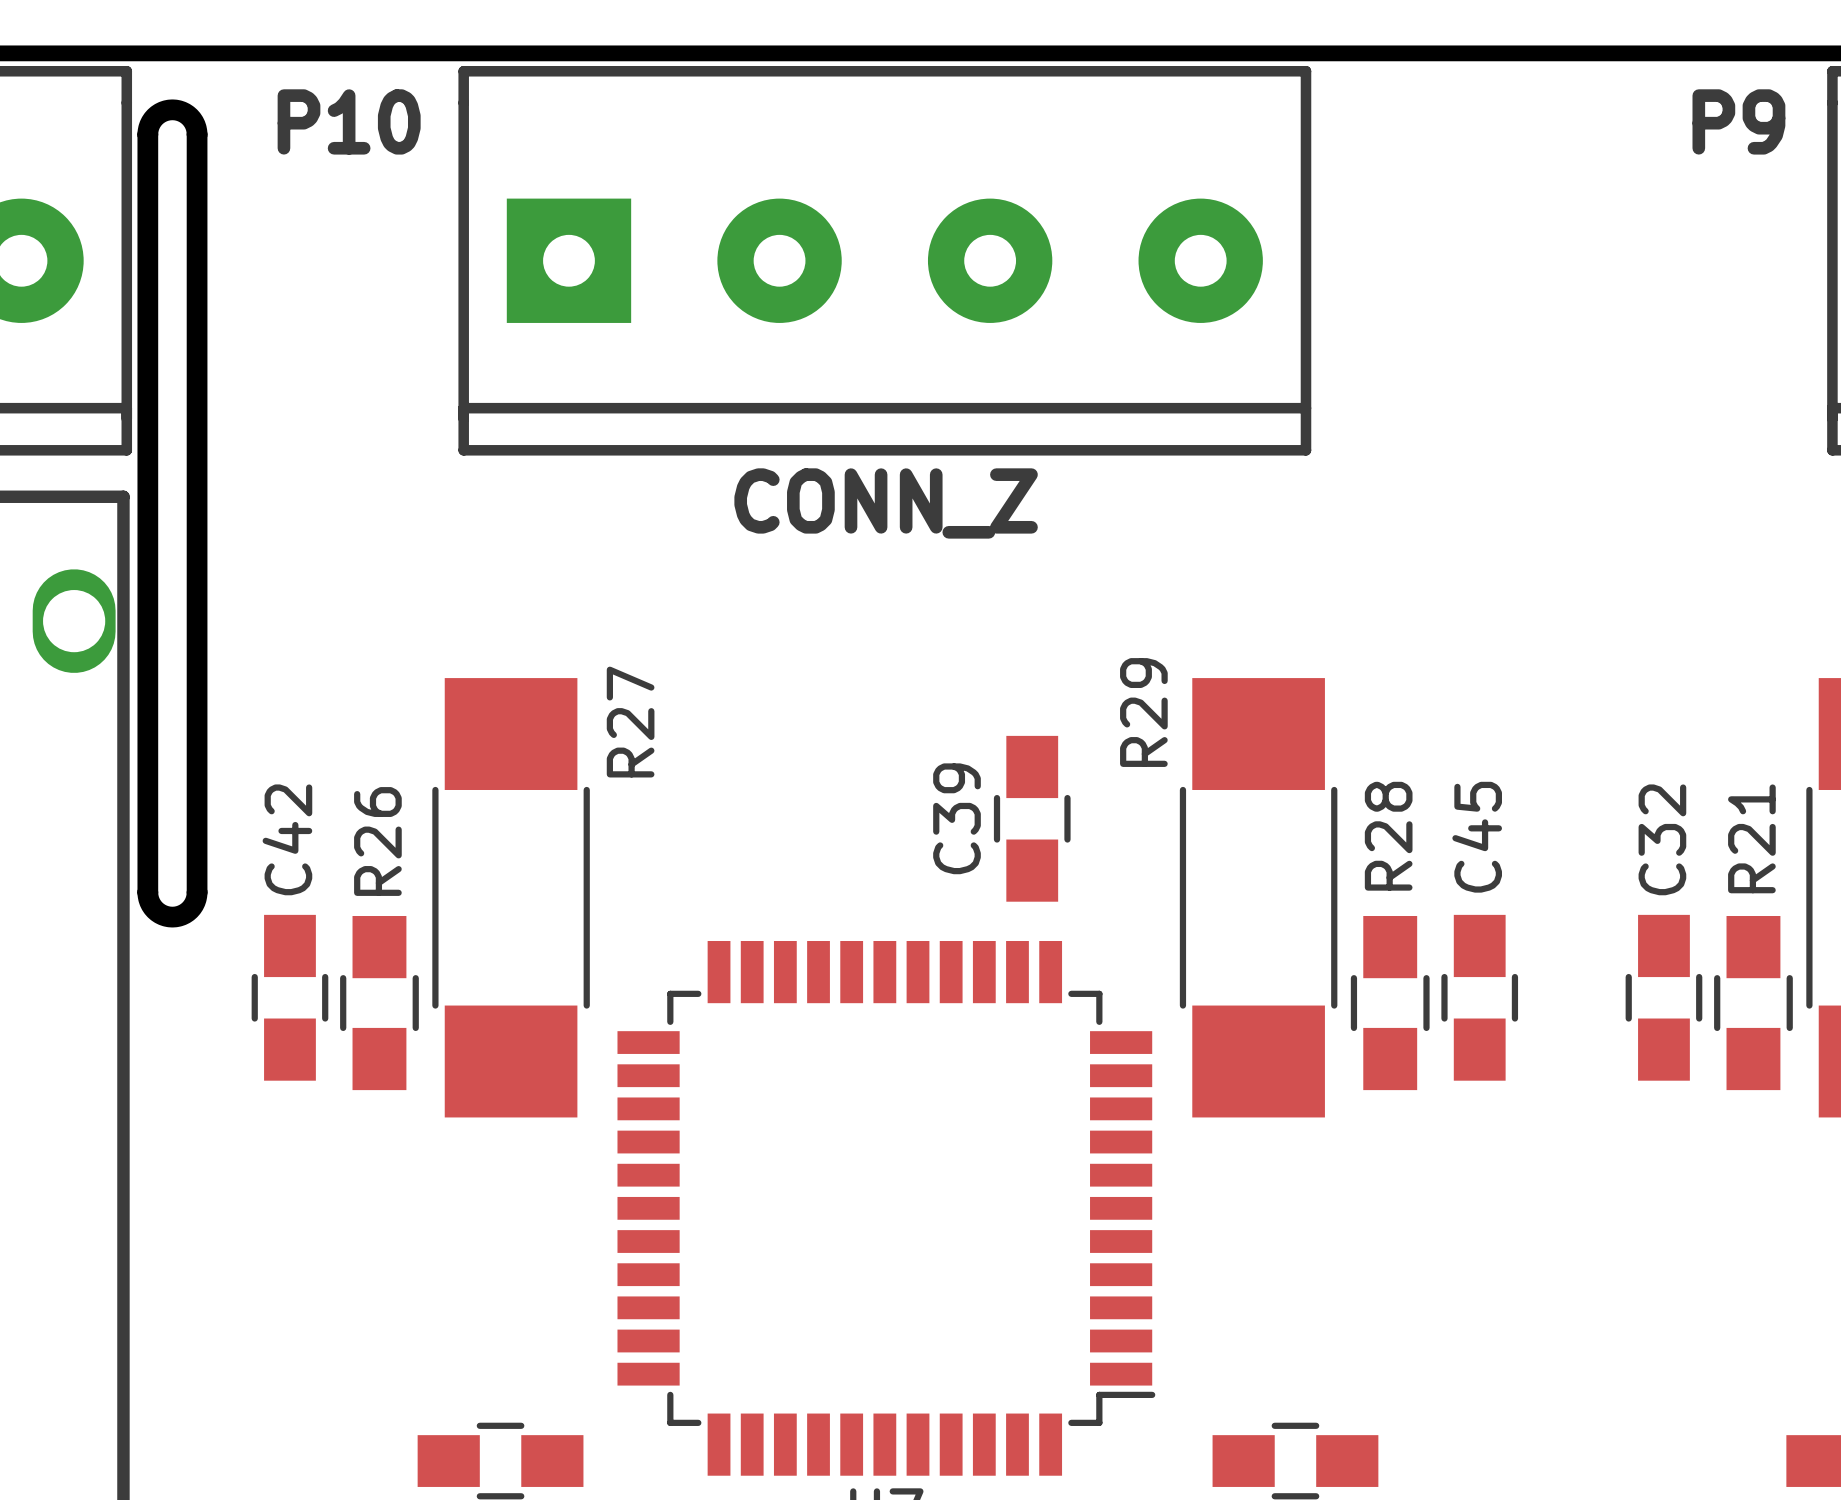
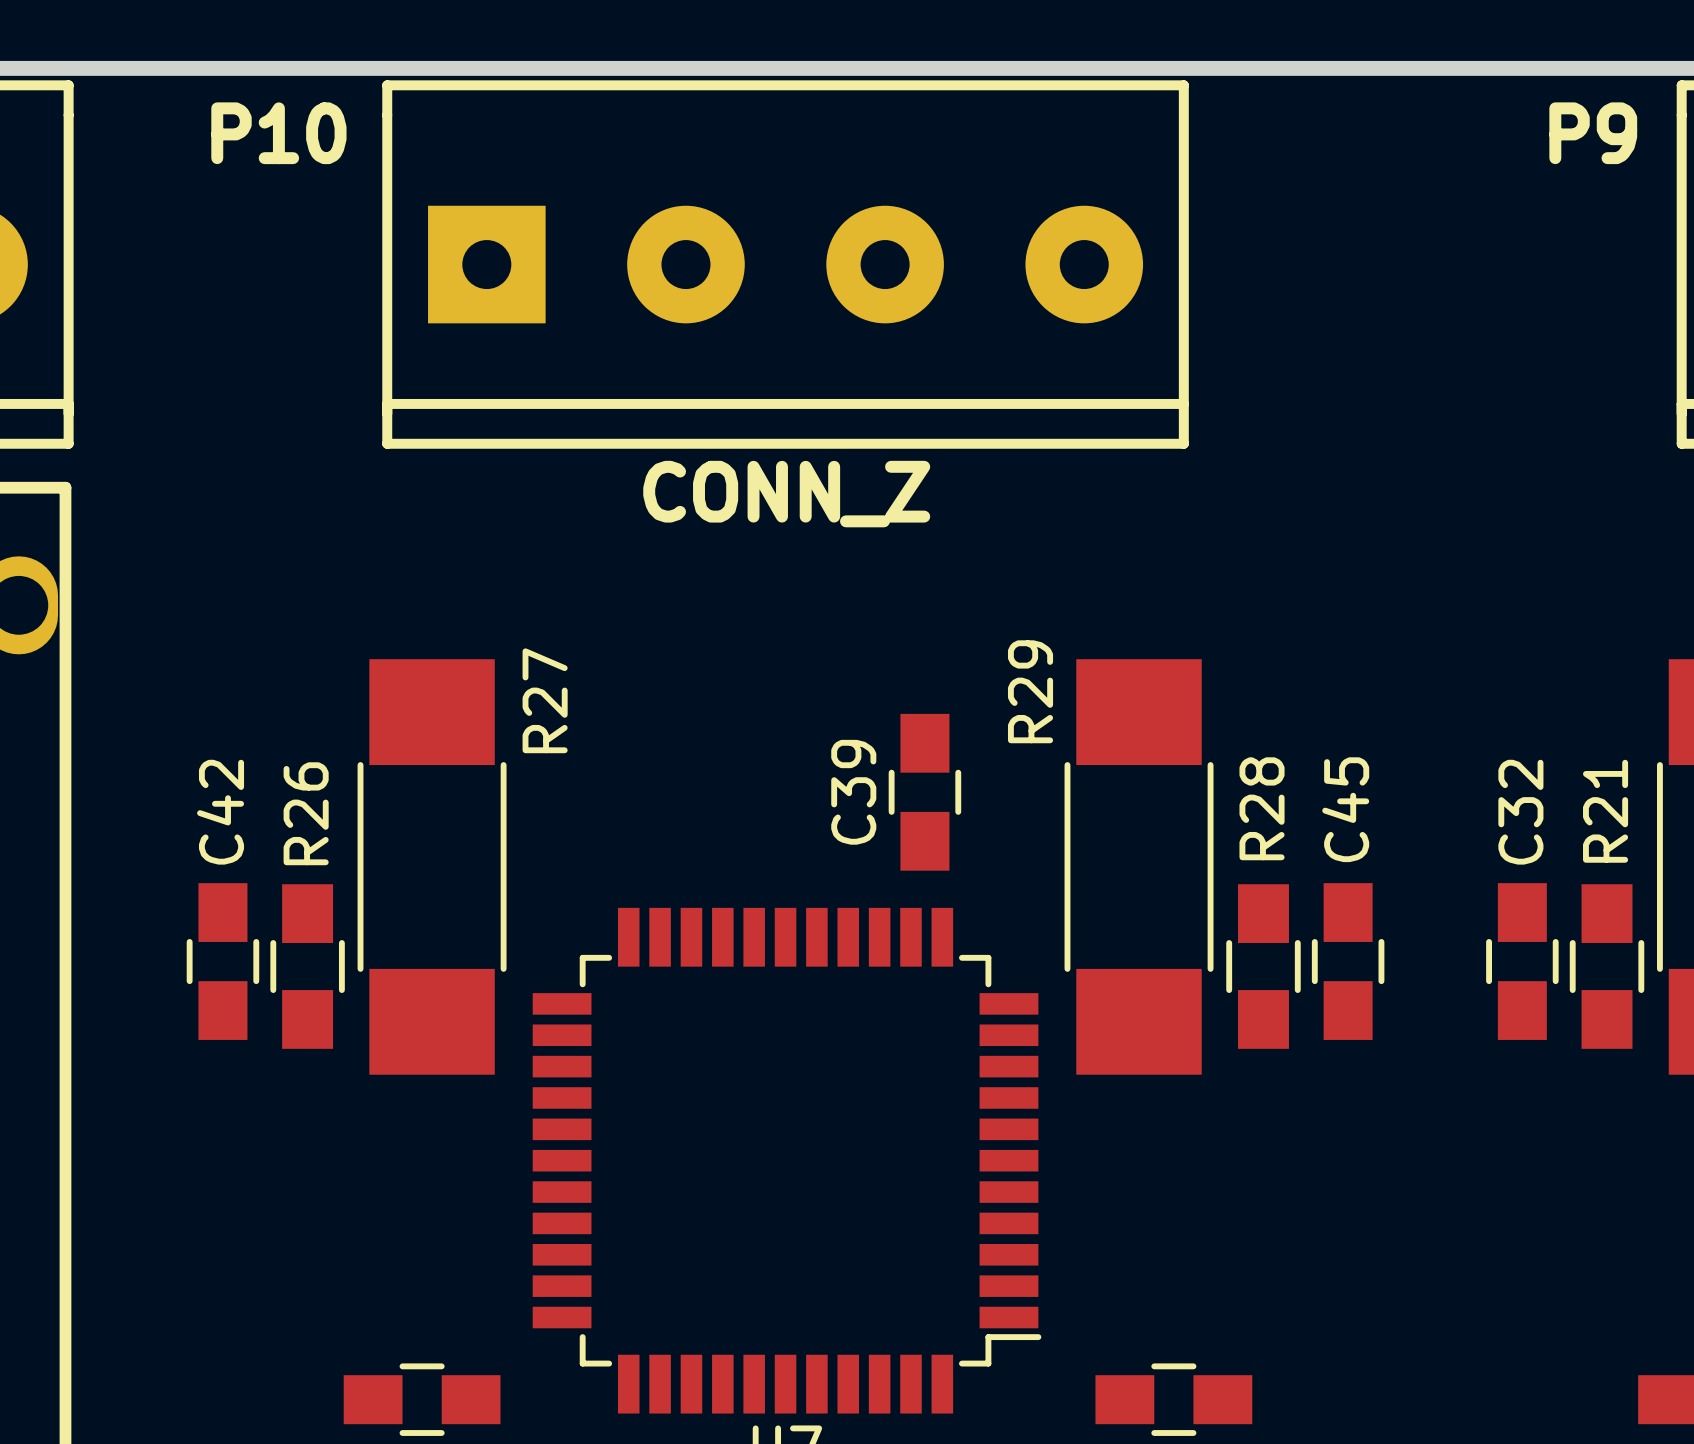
board edge: (147, 134) (147, 892) (149, 901) (155, 909) (163, 915) (172, 917) (181, 915) (189, 909) (195, 901) (197, 892) (197, 134) (195, 125) (189, 117) (181, 111) (172, 109) (163, 111) (155, 117) (149, 125) (147, 134) -> none

